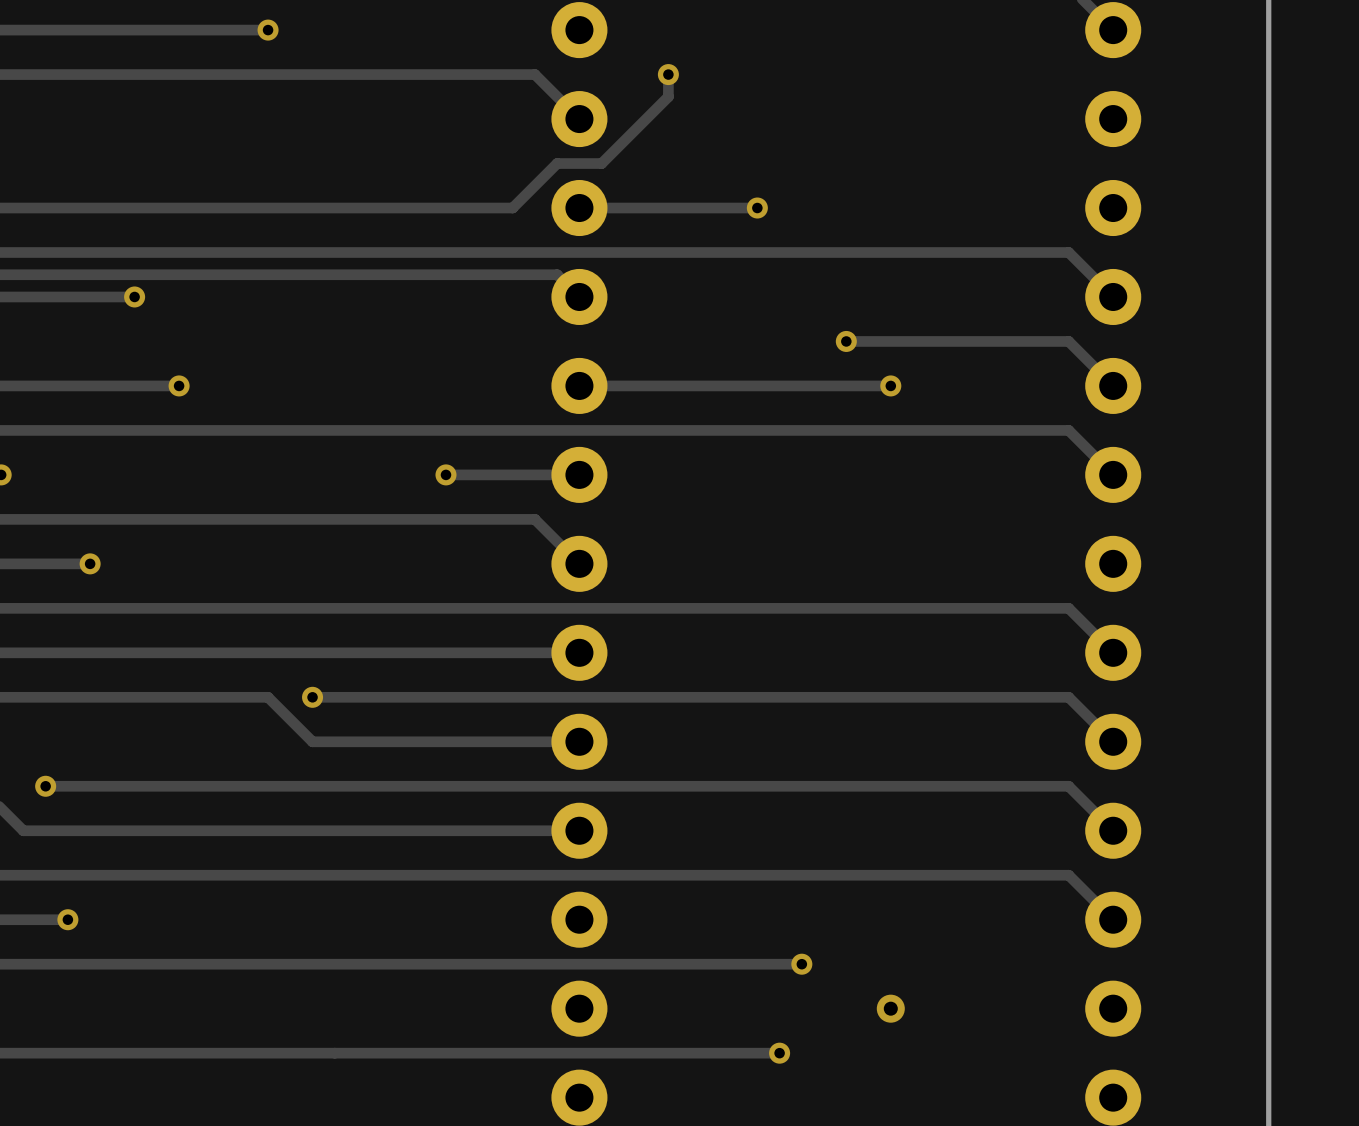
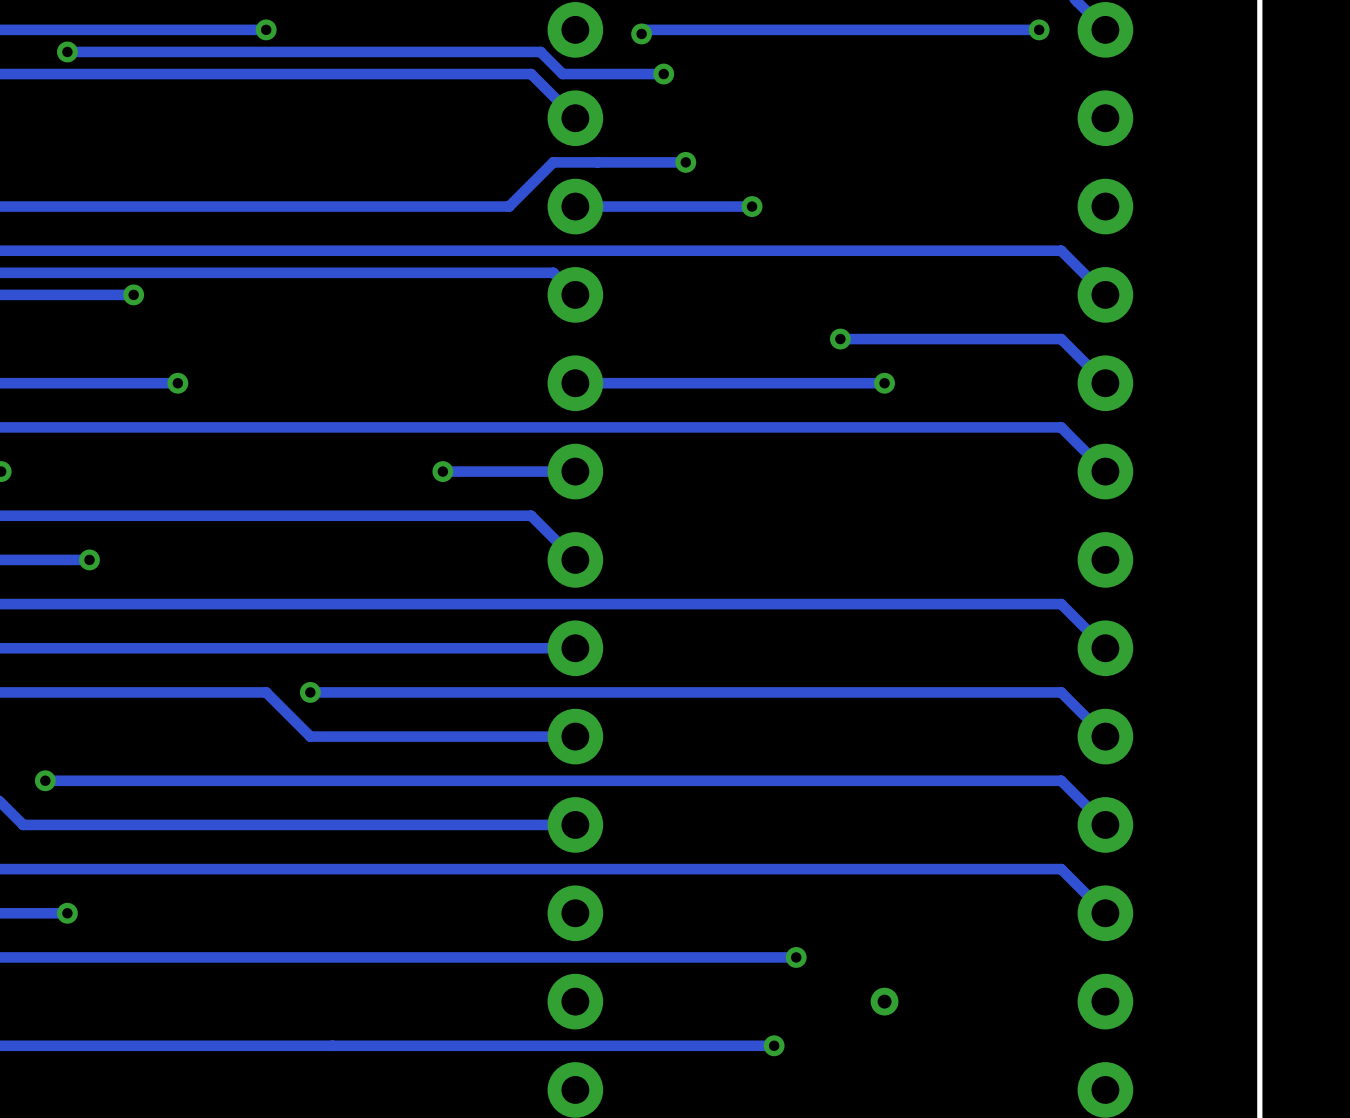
track: none -> (1039, 29) (645, 29) (641, 33)
via: none -> (1039, 29)
via: none -> (641, 33)
track: none -> (67, 51) (540, 51) (562, 74) (663, 74)
via: none -> (67, 51)
track: (668, 74) (668, 96) (601, 163) -> (685, 162) (597, 162)
via: none -> (685, 162)

